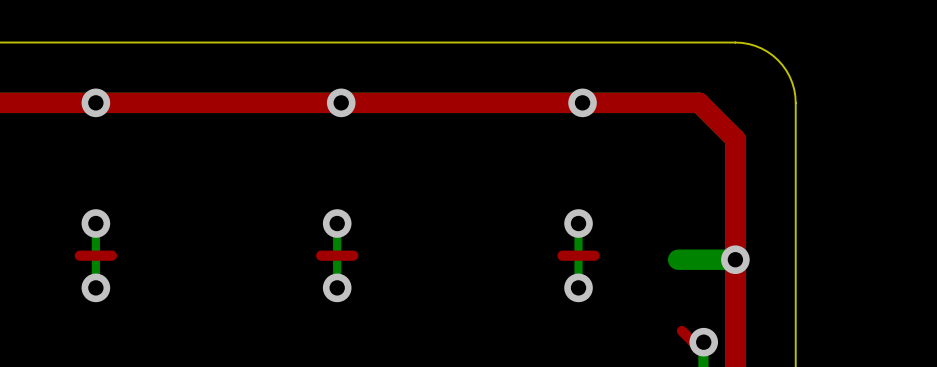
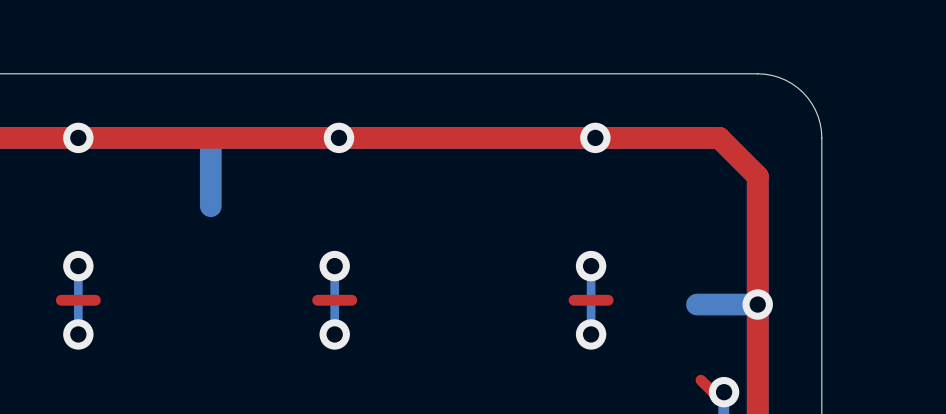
bottom track: none -> (210, 137) (210, 206)

